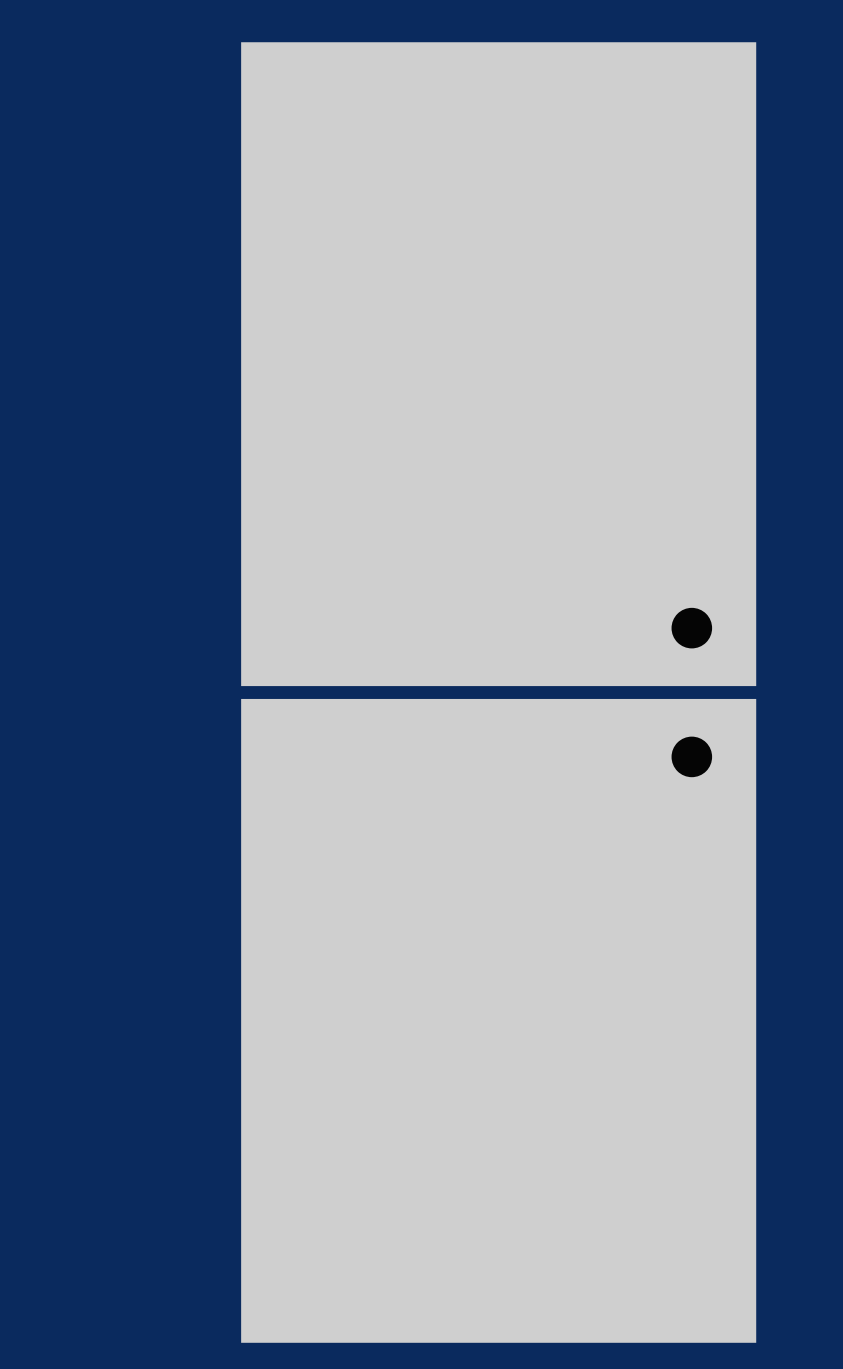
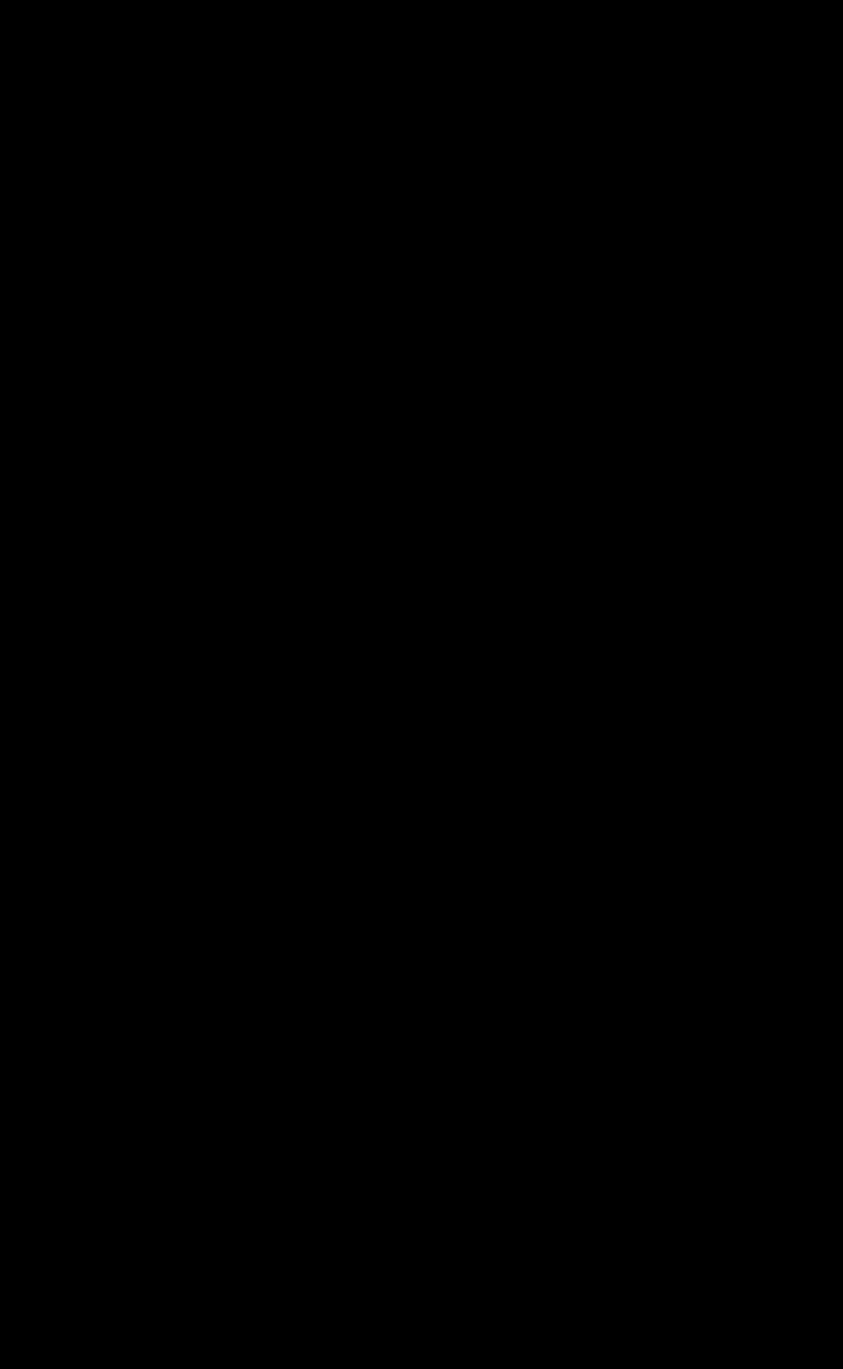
part: (498, 692) -> none

